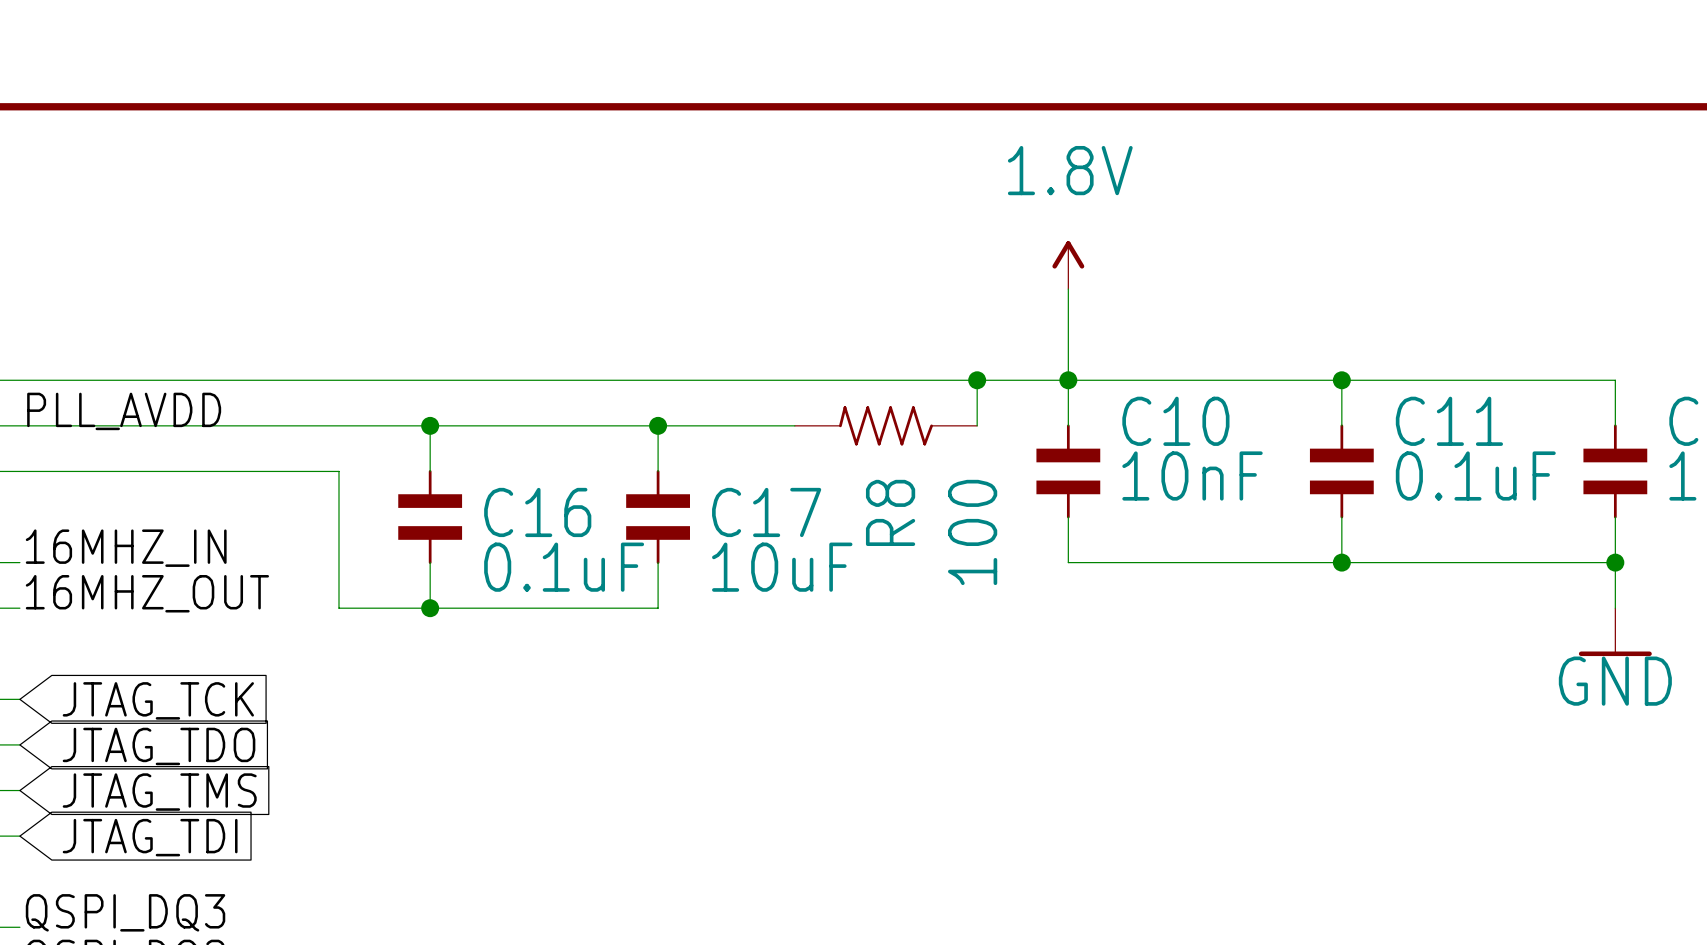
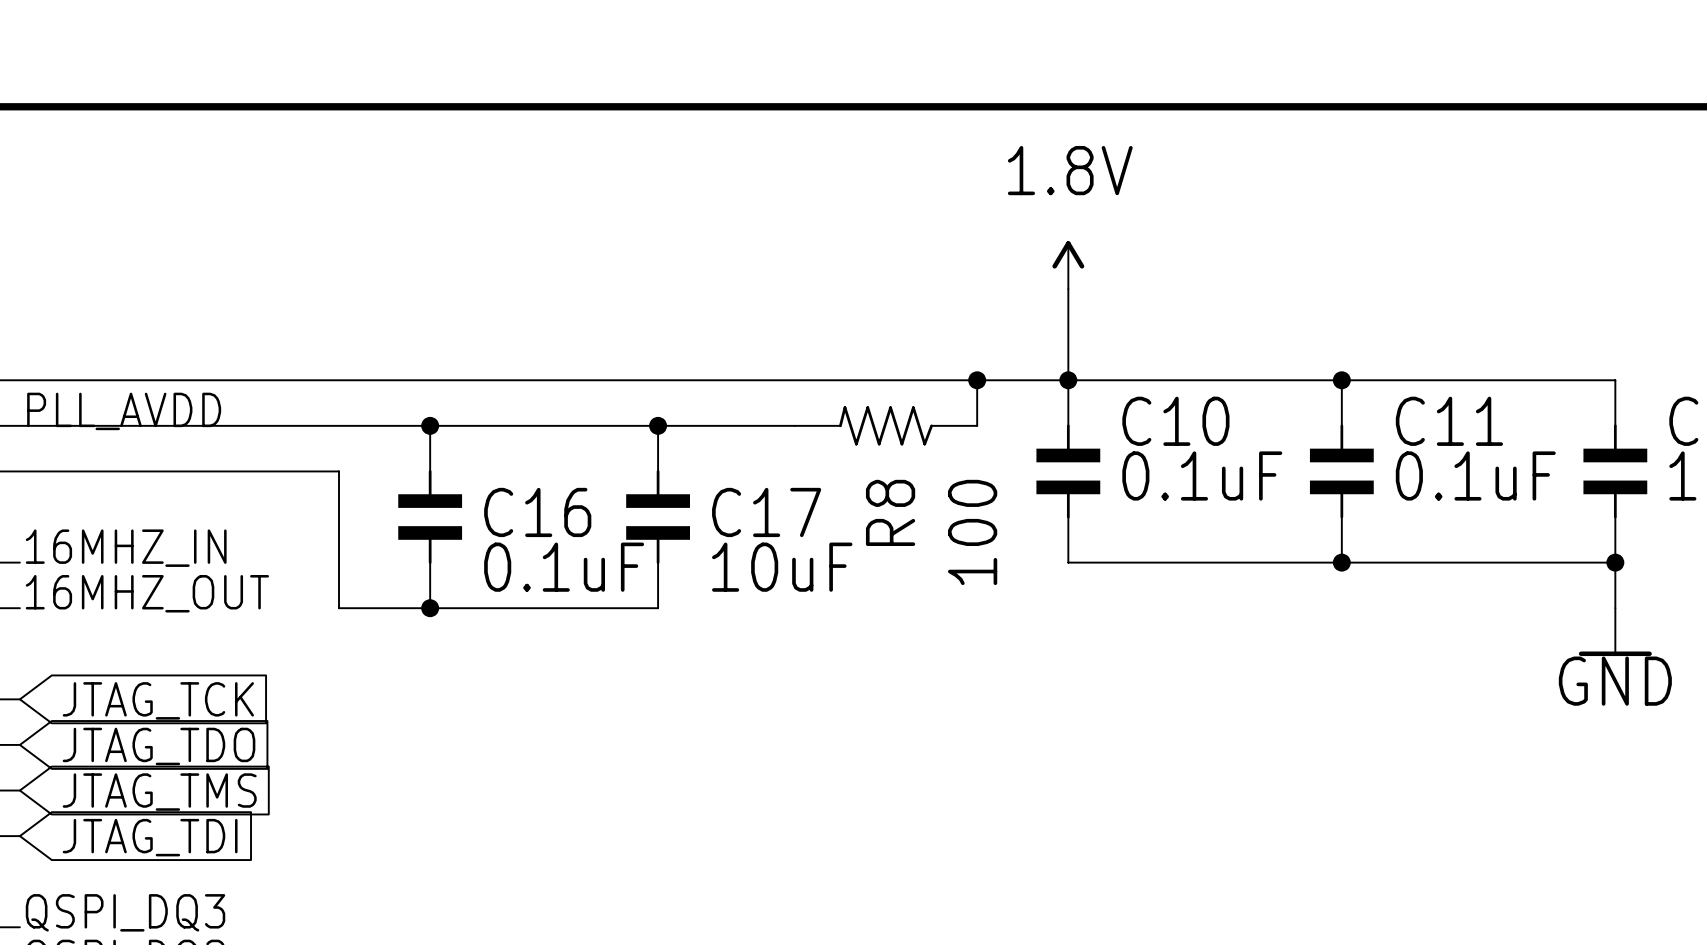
C10 value: 10nF (1192, 476) -> 0.1uF (1202, 476)

